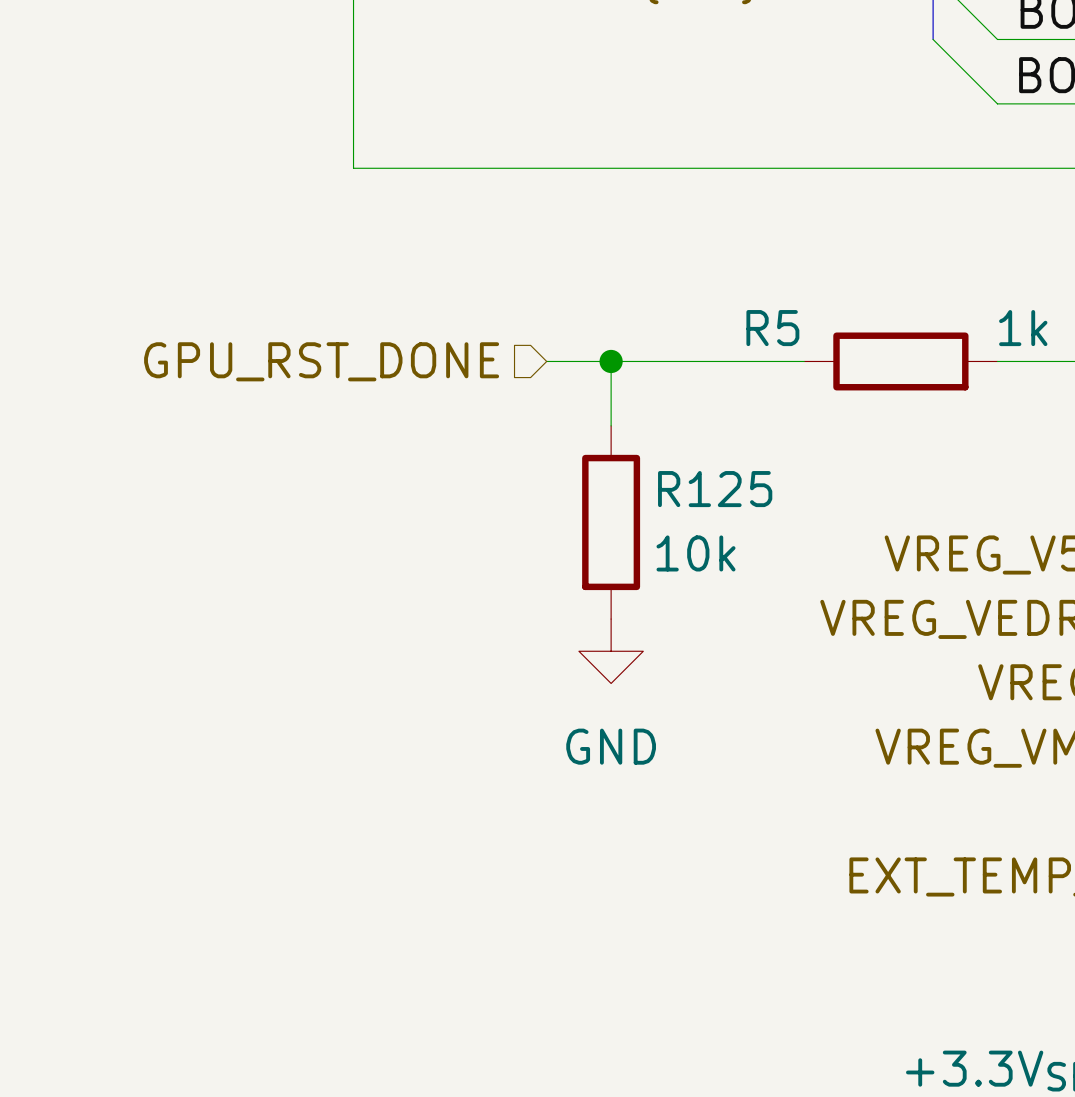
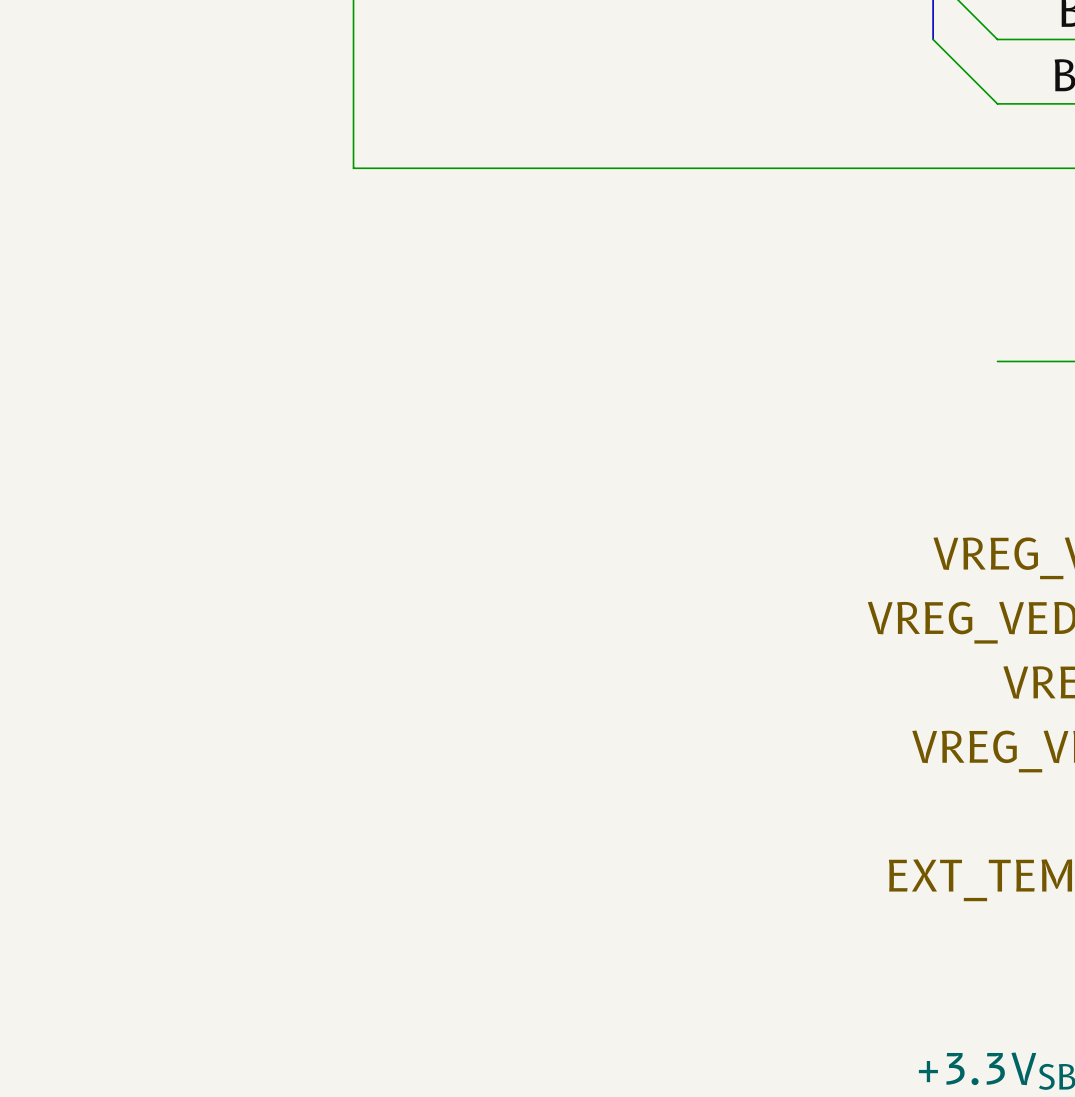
hierarchical label: GPU_RST_DONE (321, 361) -> none
wire: (546, 361) (804, 361) -> none
wire: (611, 361) (611, 425) -> none
junction: (611, 361) -> none
R5: 1k (900, 361) -> none
R125: 10k (611, 522) -> none
power symbol: GND (611, 651) -> none

